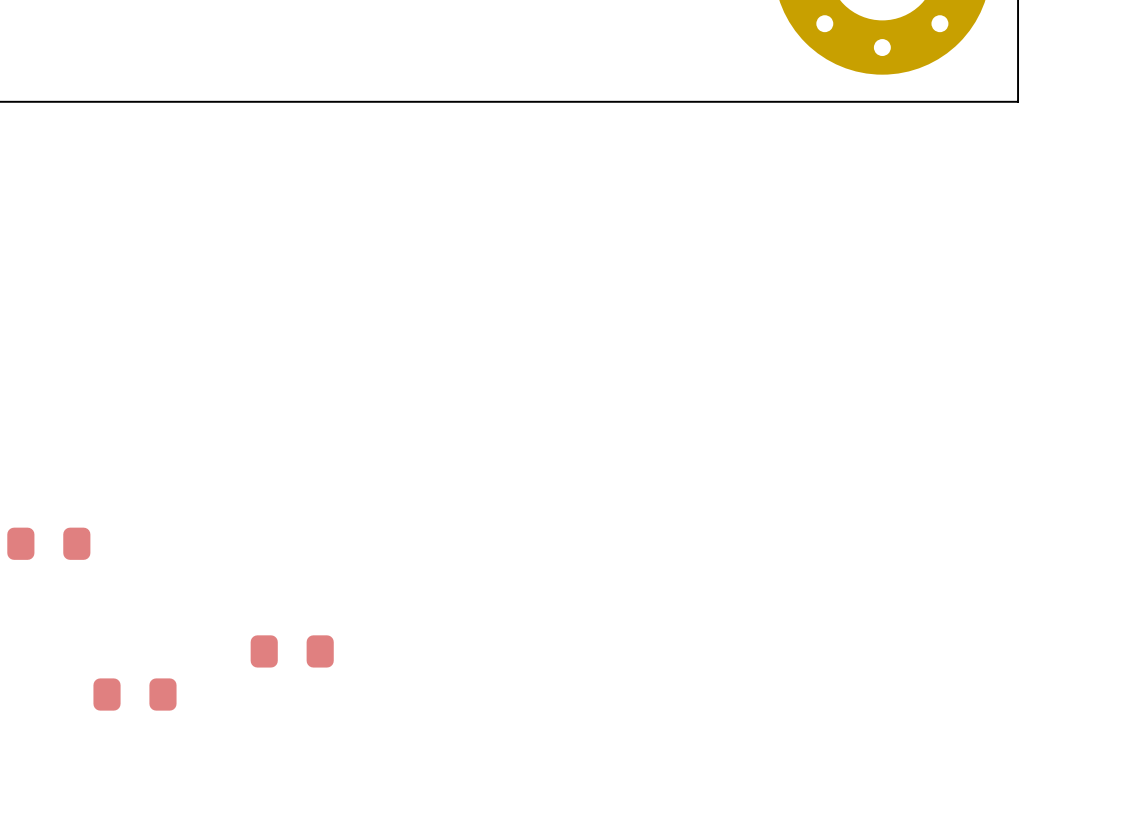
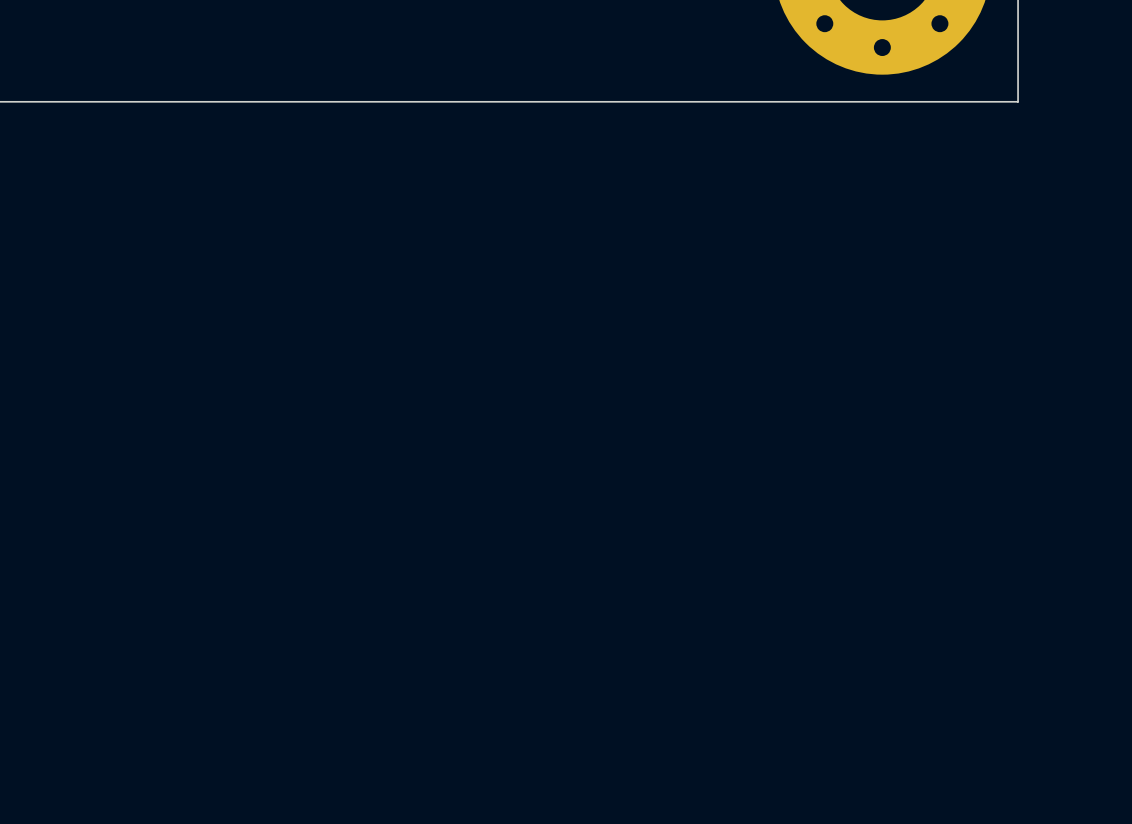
part: (48, 543) -> none
part: (292, 651) -> none
part: (134, 694) -> none

